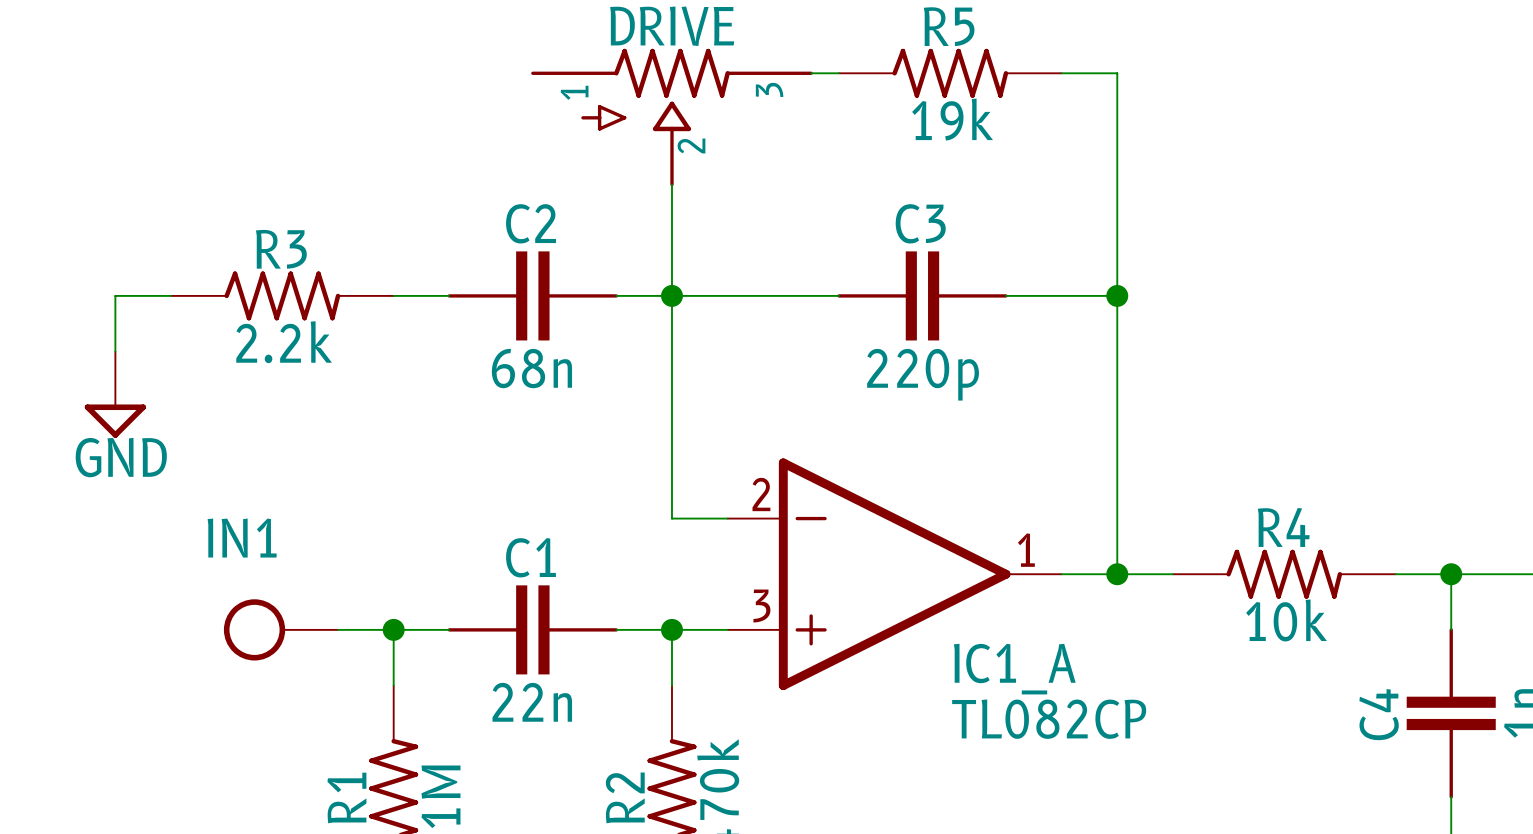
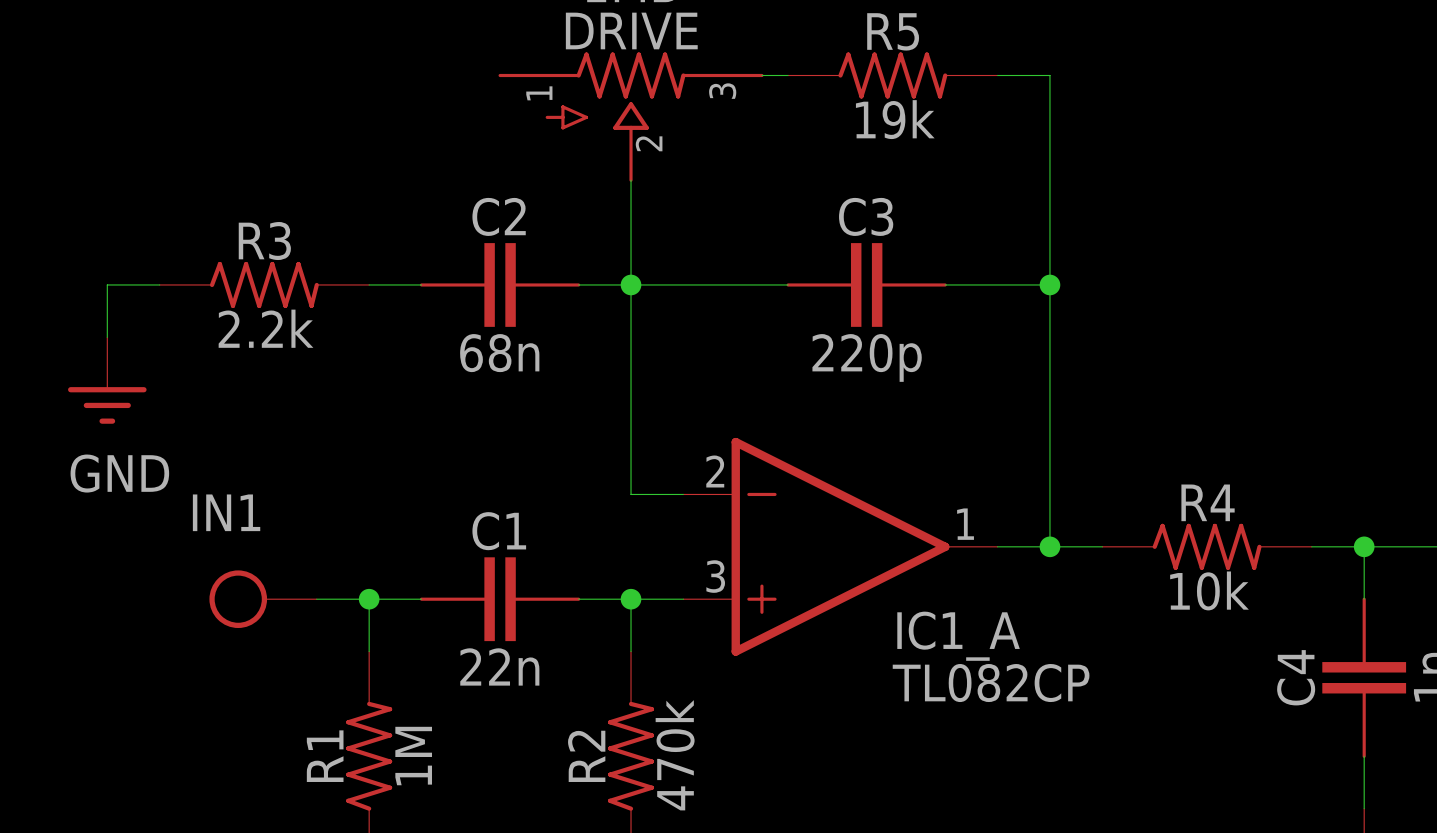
power symbol shape: [84, 351, 146, 438] -> [68, 337, 147, 424]
power symbol text position: GND (121, 457) -> GND (119, 473)

